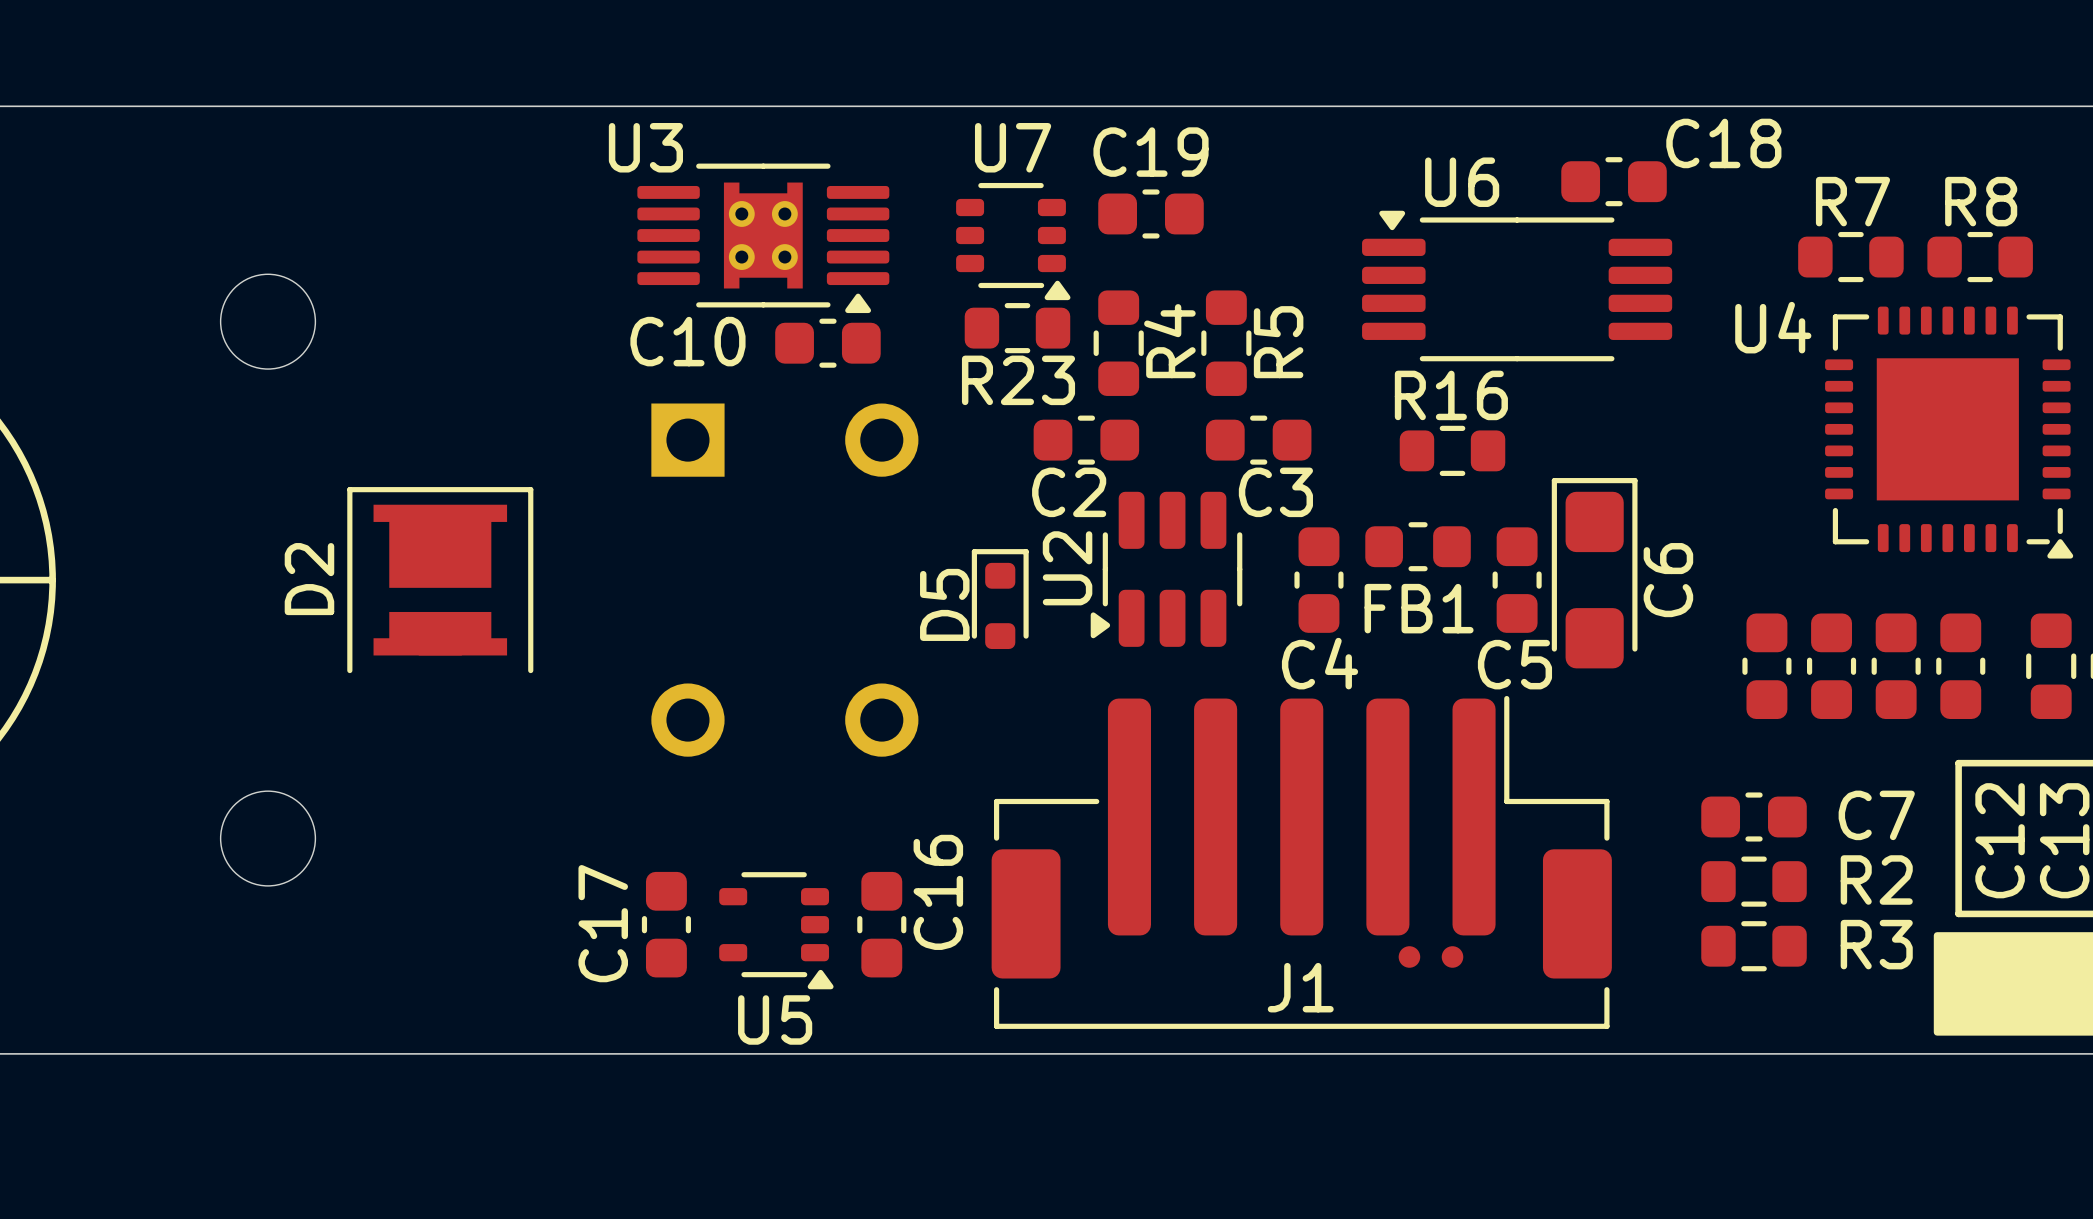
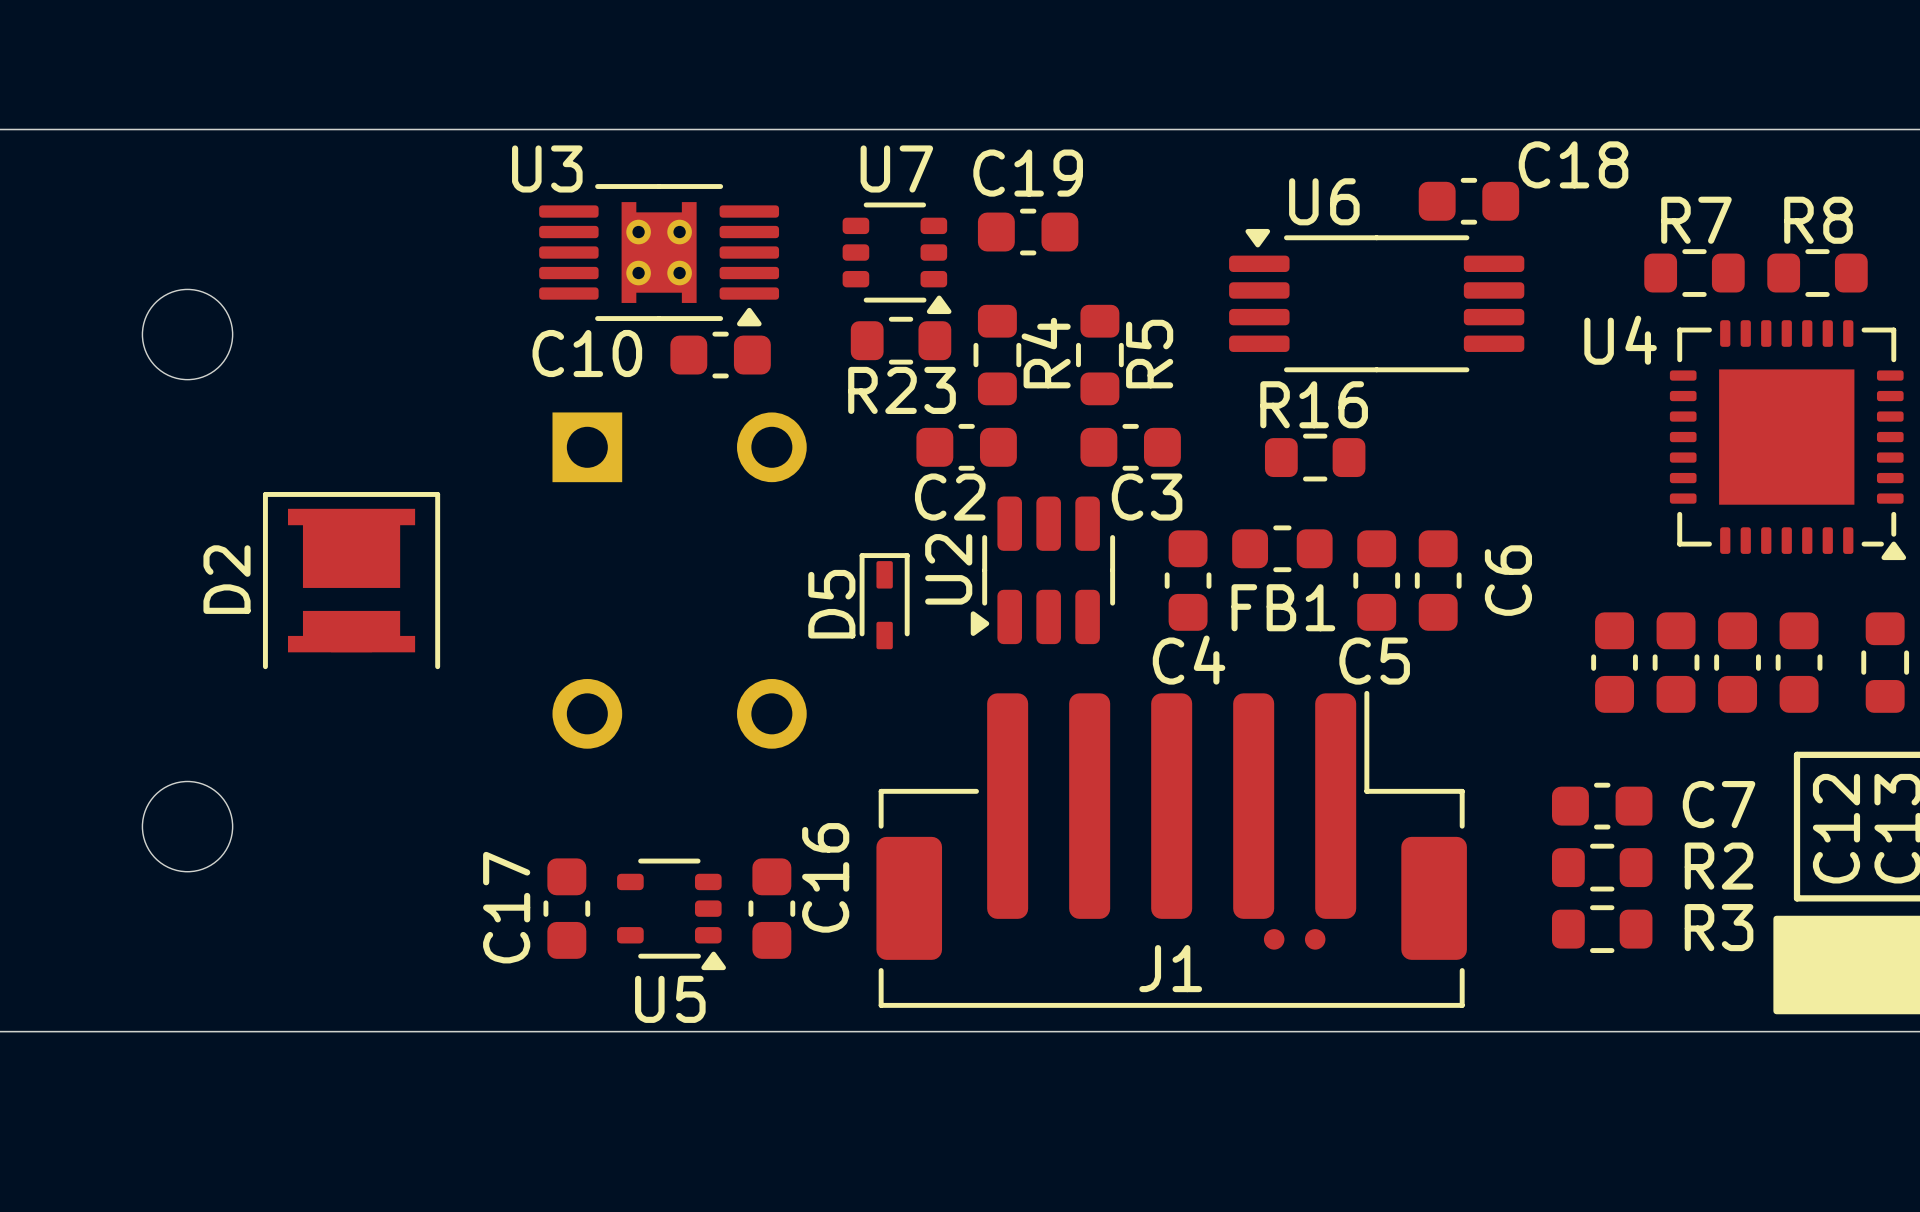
C6 footprint: [1551, 478, 1638, 669] -> [1414, 530, 1462, 631]
D5 footprint: [971, 549, 1029, 650] -> [859, 553, 910, 650]

